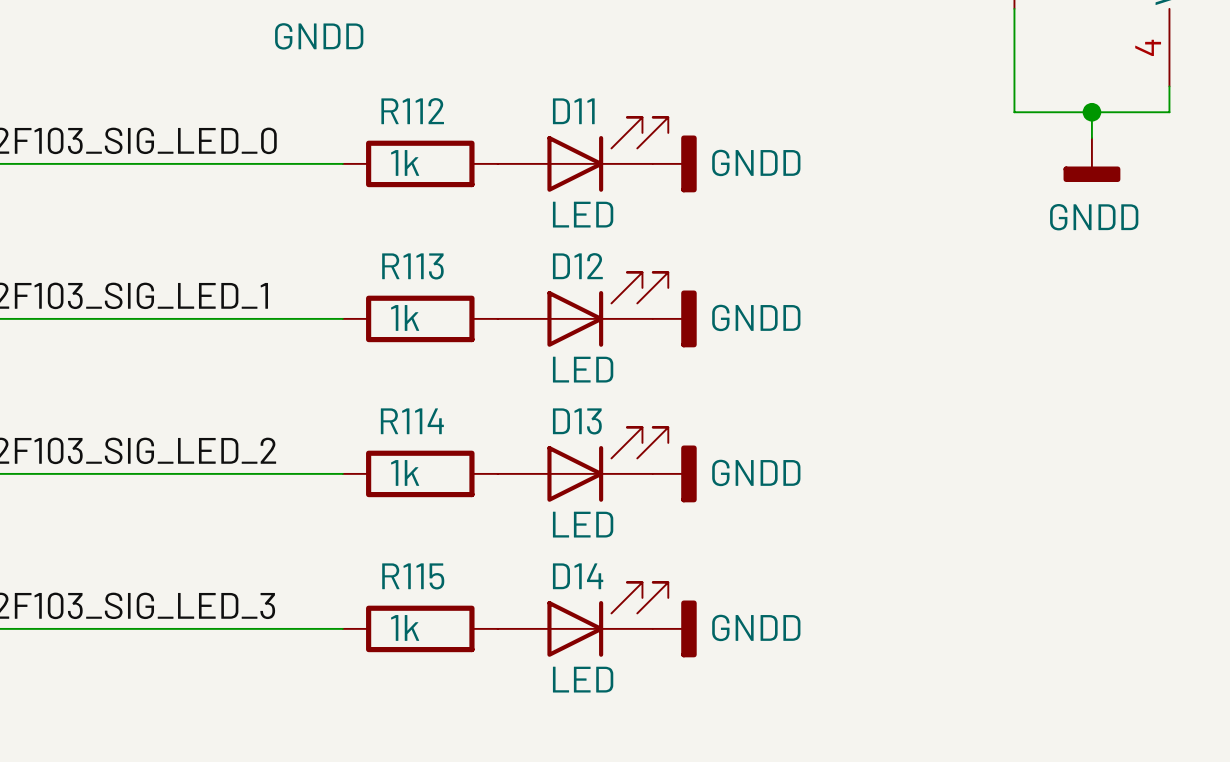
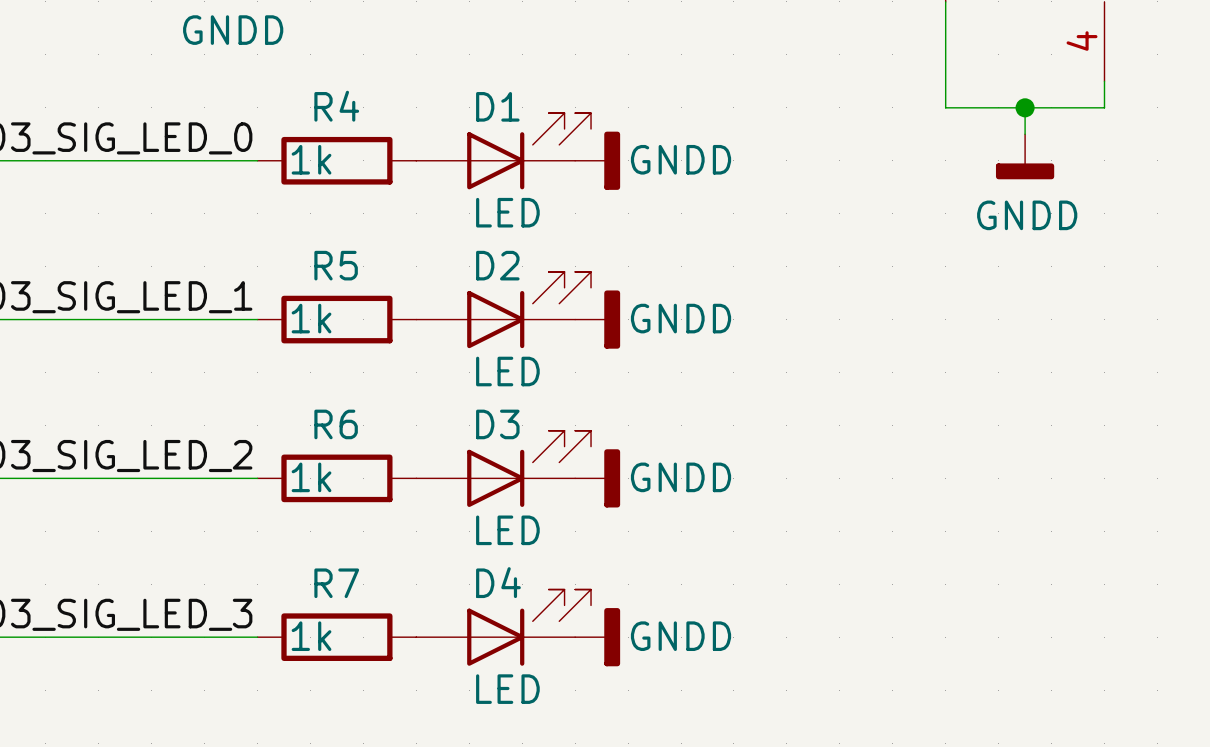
R112 name: R112 (412, 111) -> R4 (336, 106)
D11 name: D11 (573, 111) -> D1 (497, 106)
R113 name: R113 (412, 266) -> R5 (336, 265)
D12 name: D12 (577, 266) -> D2 (497, 265)
R114 name: R114 (412, 421) -> R6 (336, 424)
D13 name: D13 (577, 421) -> D3 (497, 424)
R115 name: R115 (413, 576) -> R7 (336, 583)
D14 name: D14 (578, 576) -> D4 (498, 582)

